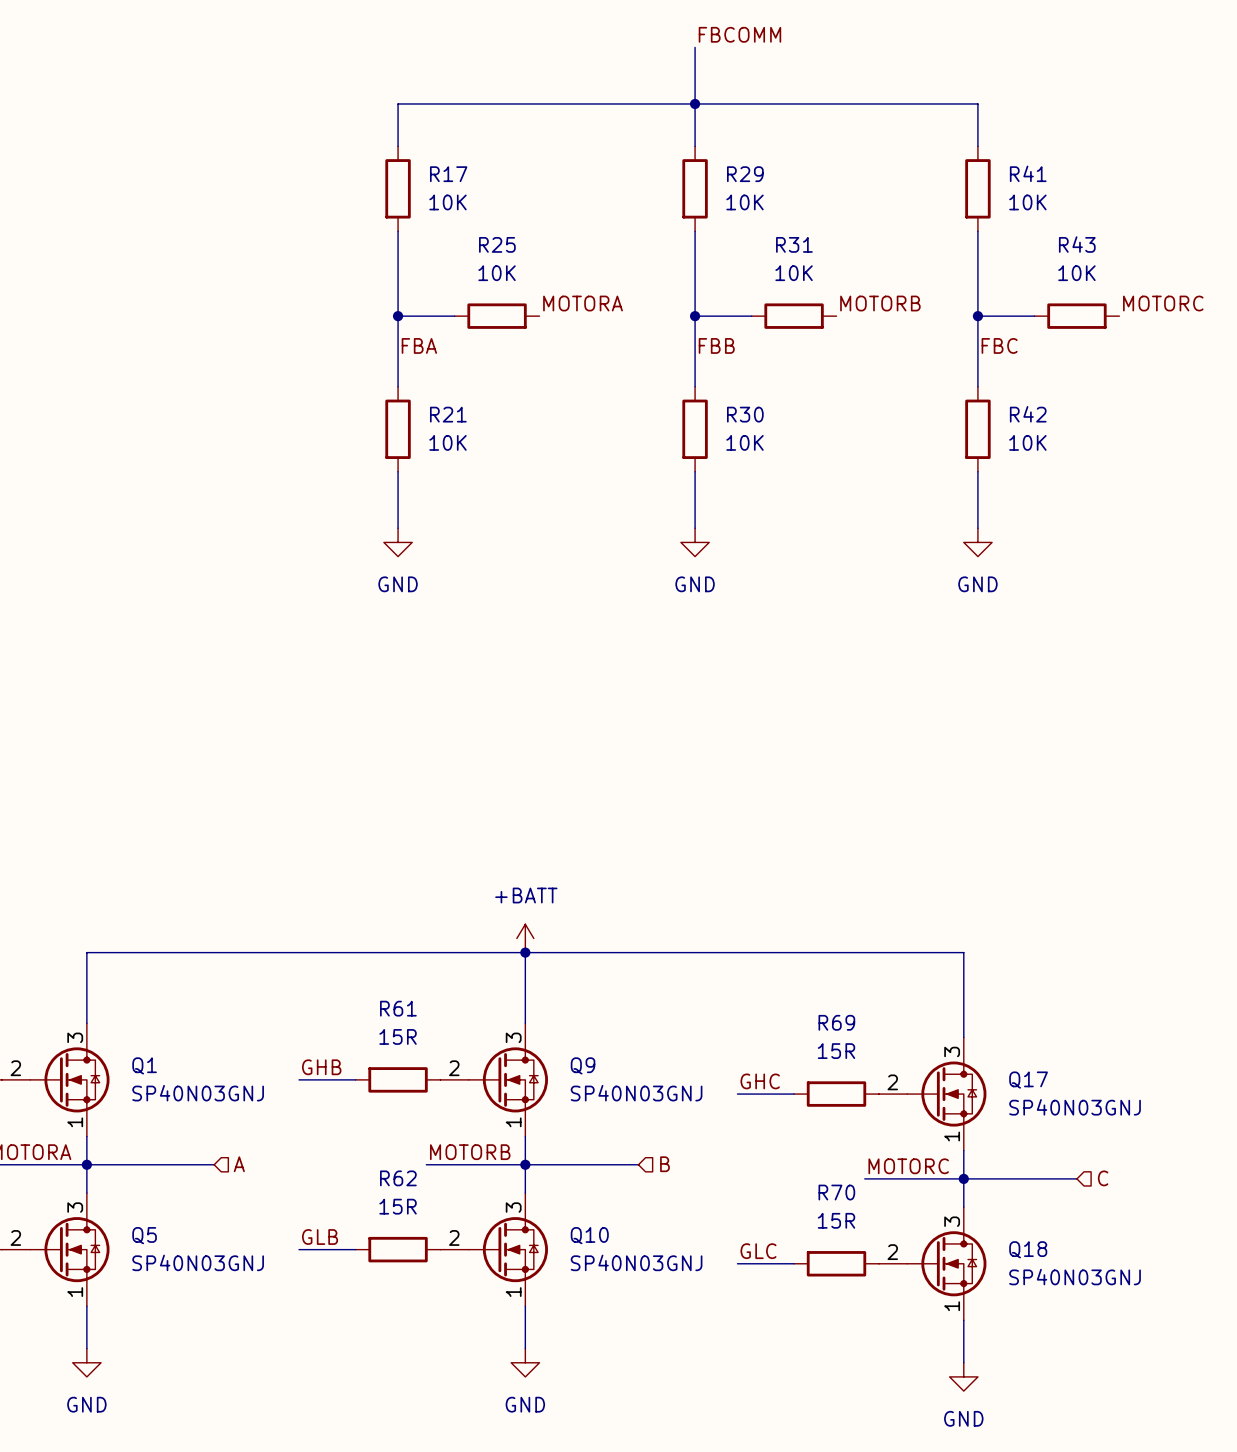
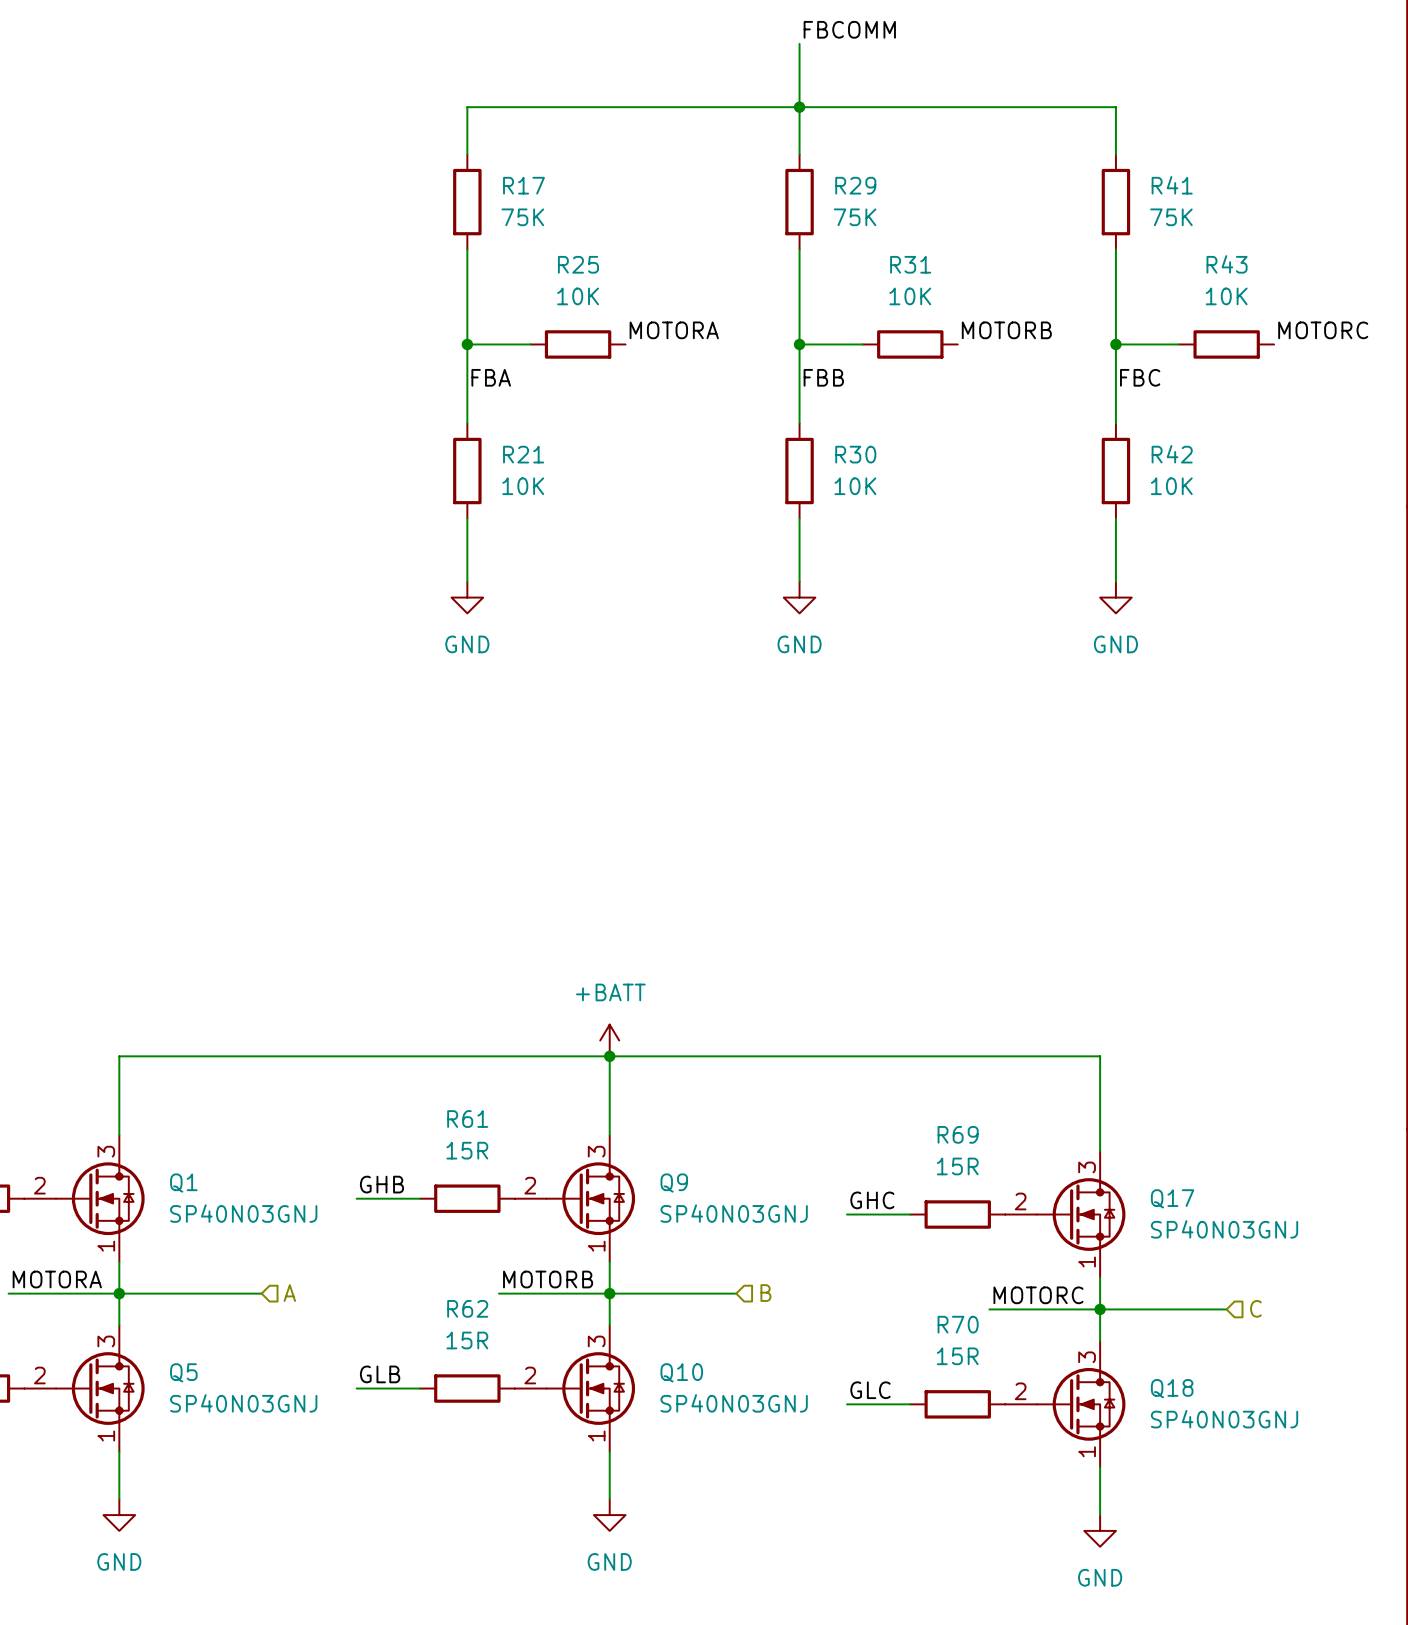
R17 value: 10K (447, 202) -> 75K (522, 217)
R29 value: 10K (745, 202) -> 75K (855, 217)
R41 value: 10K (1027, 202) -> 75K (1171, 217)

